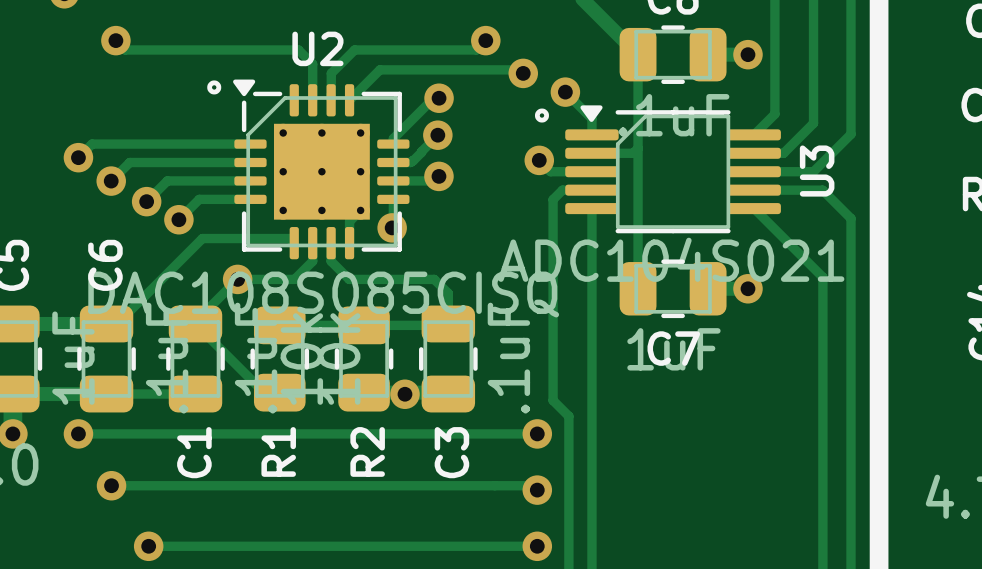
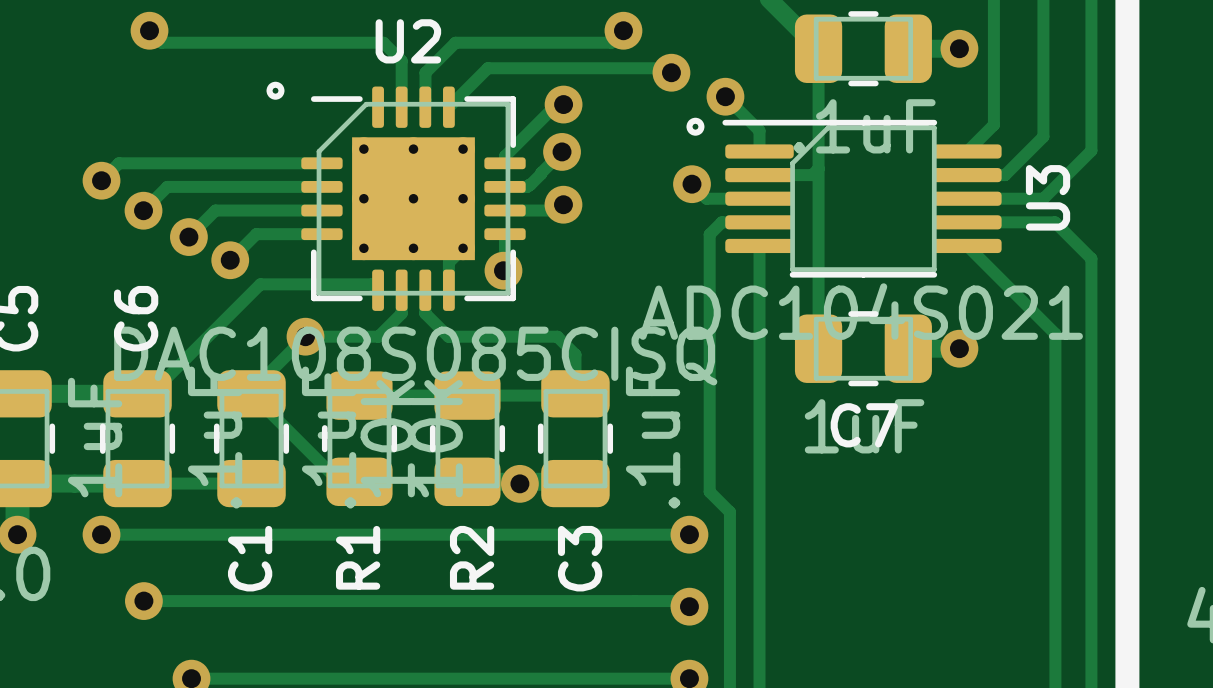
U2 footprint: [233, 79, 410, 260] -> [301, 86, 526, 311]
U3 footprint: [565, 105, 781, 234] -> [722, 119, 1002, 278]

